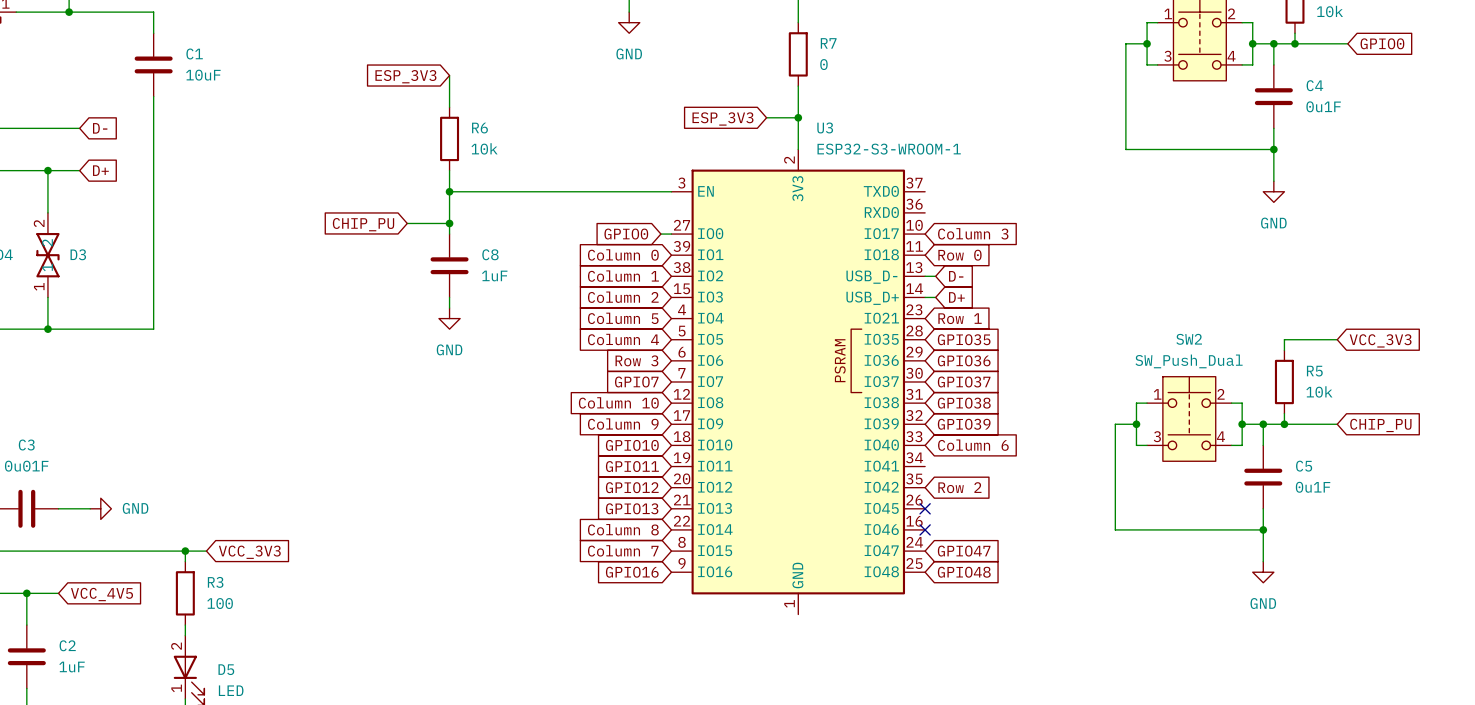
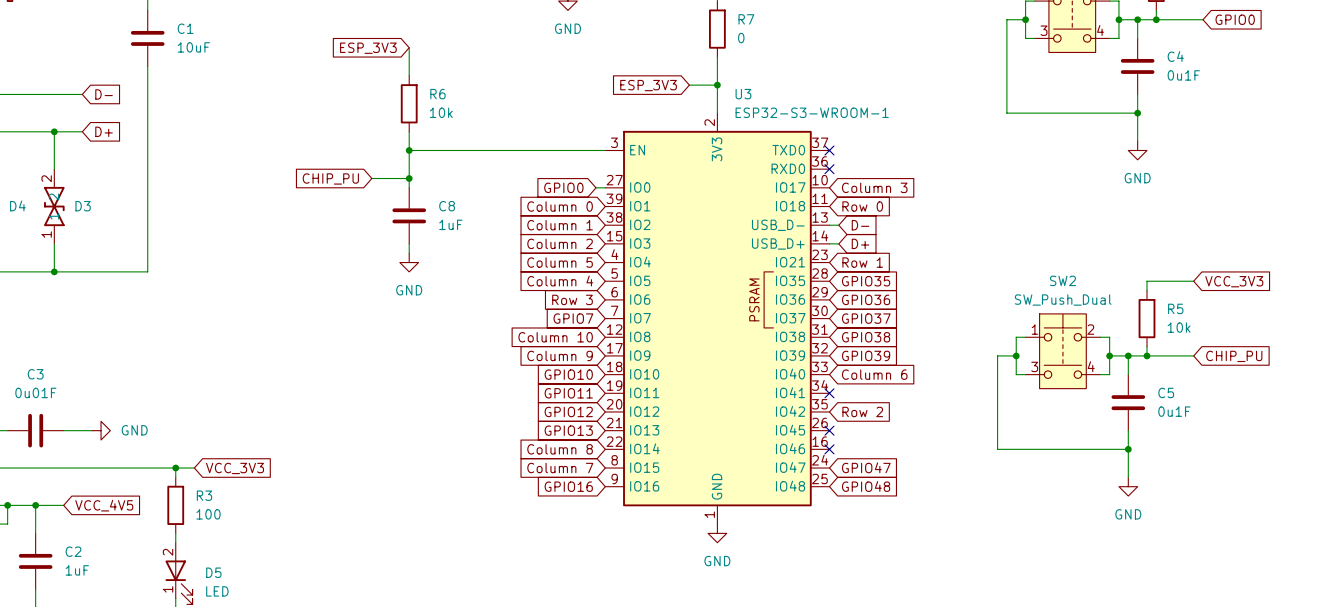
no-connect mark: none -> (829, 150)
no-connect mark: none -> (829, 169)
no-connect mark: none -> (829, 393)
power symbol: none -> GND (717, 533)

